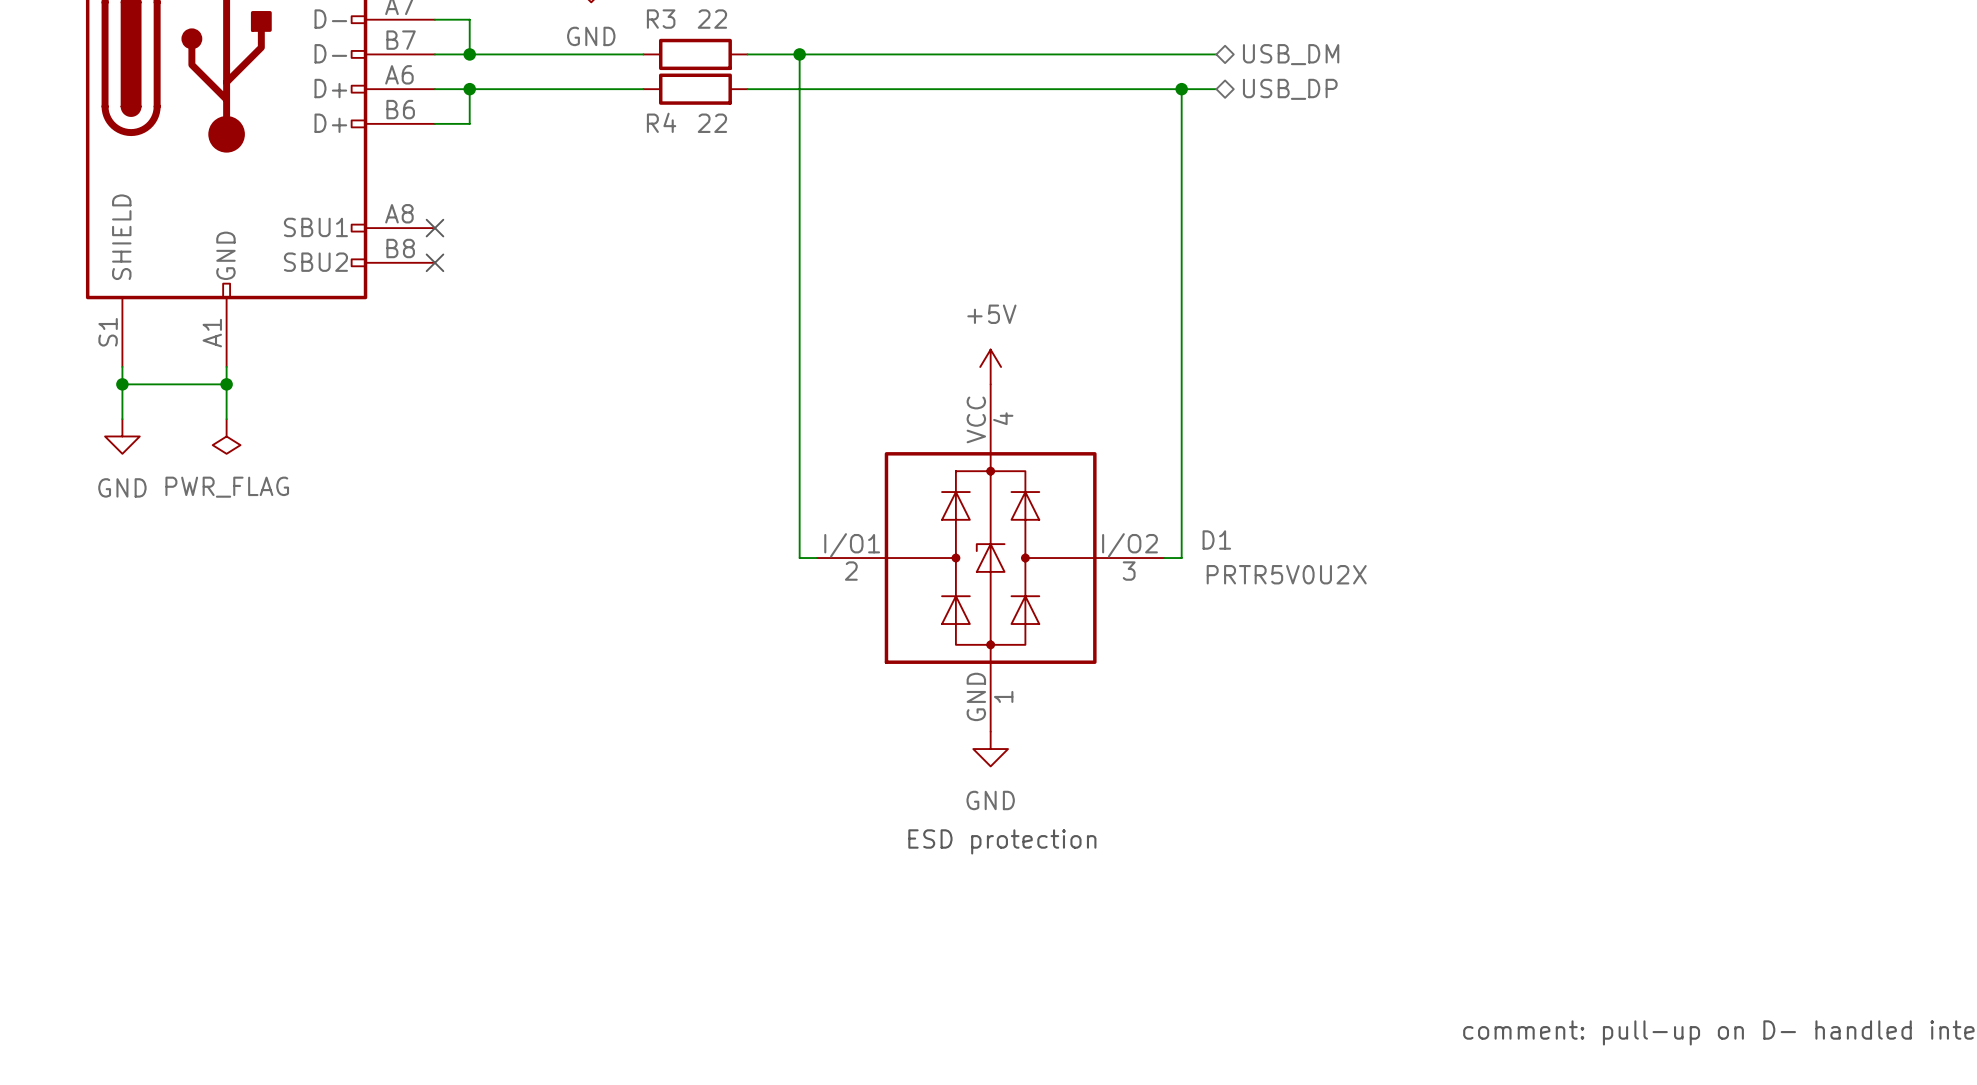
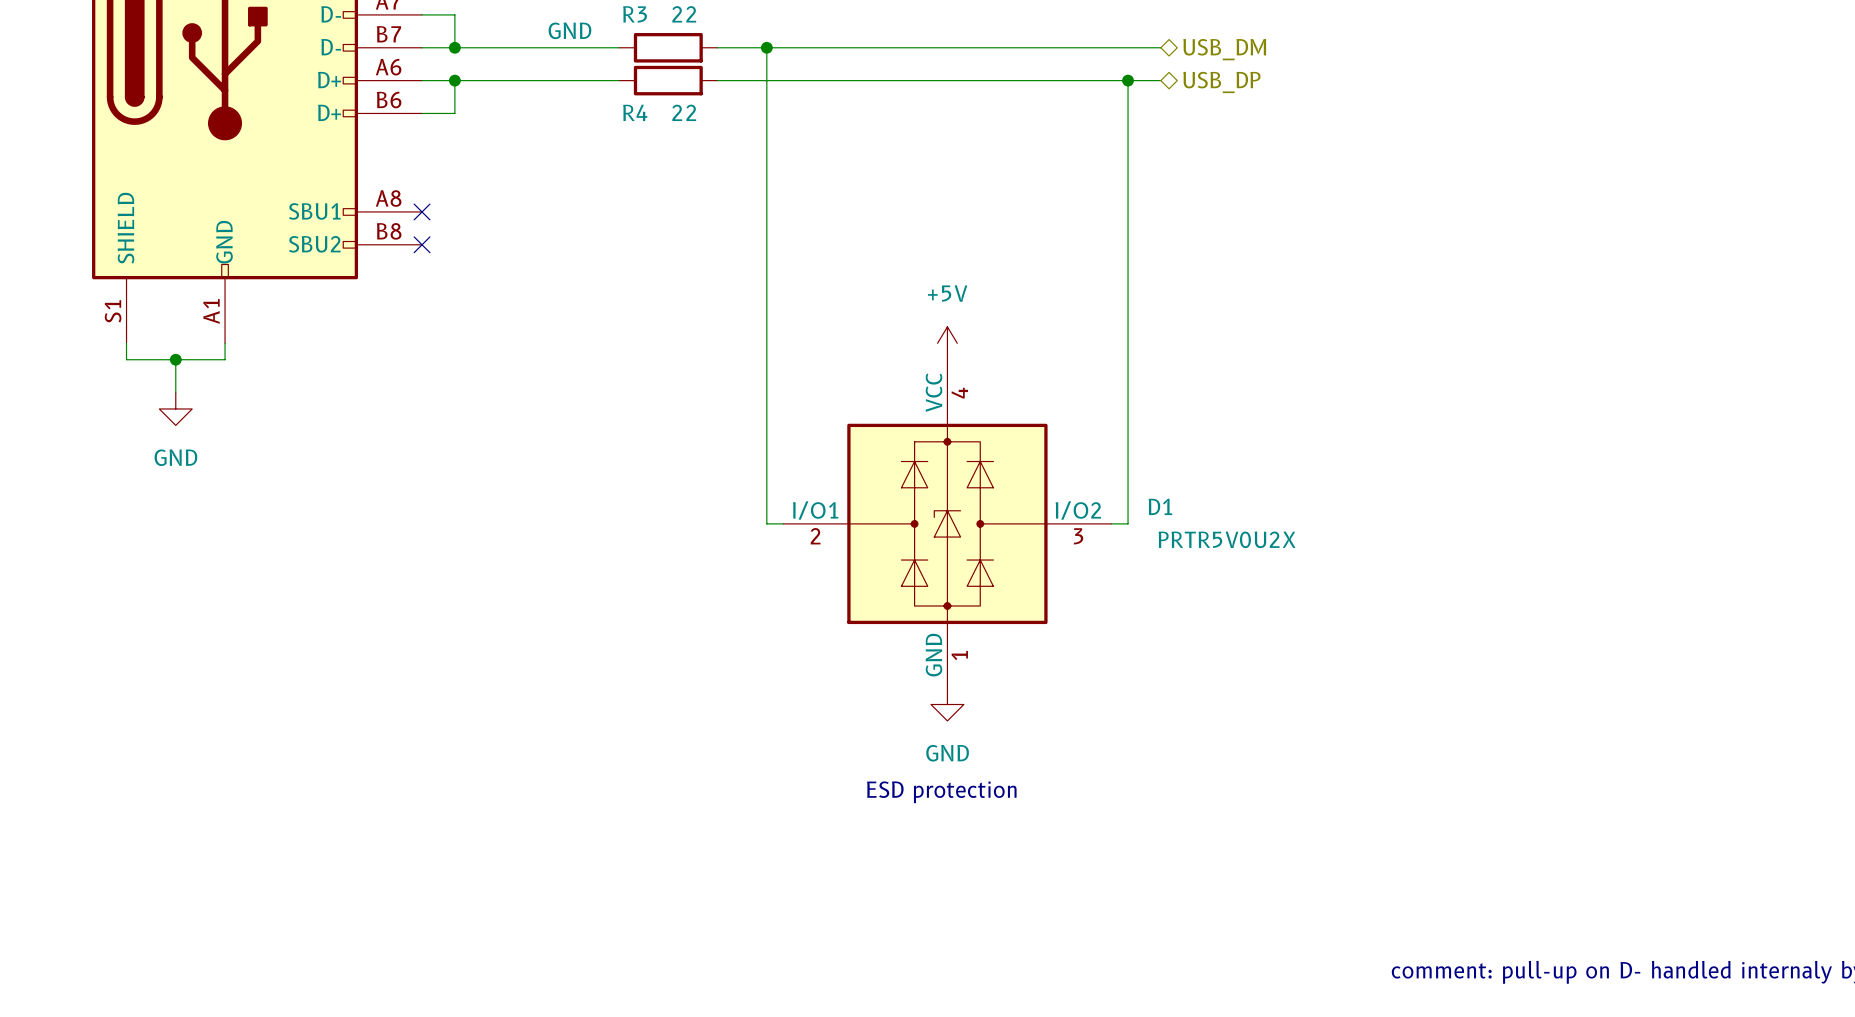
wire: (122, 384) (122, 419) -> (175, 359) (175, 392)
junction: (122, 384) -> none
junction: none -> (175, 359)
wire: (226, 384) (226, 419) -> none
junction: (226, 384) -> none
power symbol position: GND (122, 436) -> GND (175, 408)
power symbol: PWR_FLAG (226, 436) -> none

